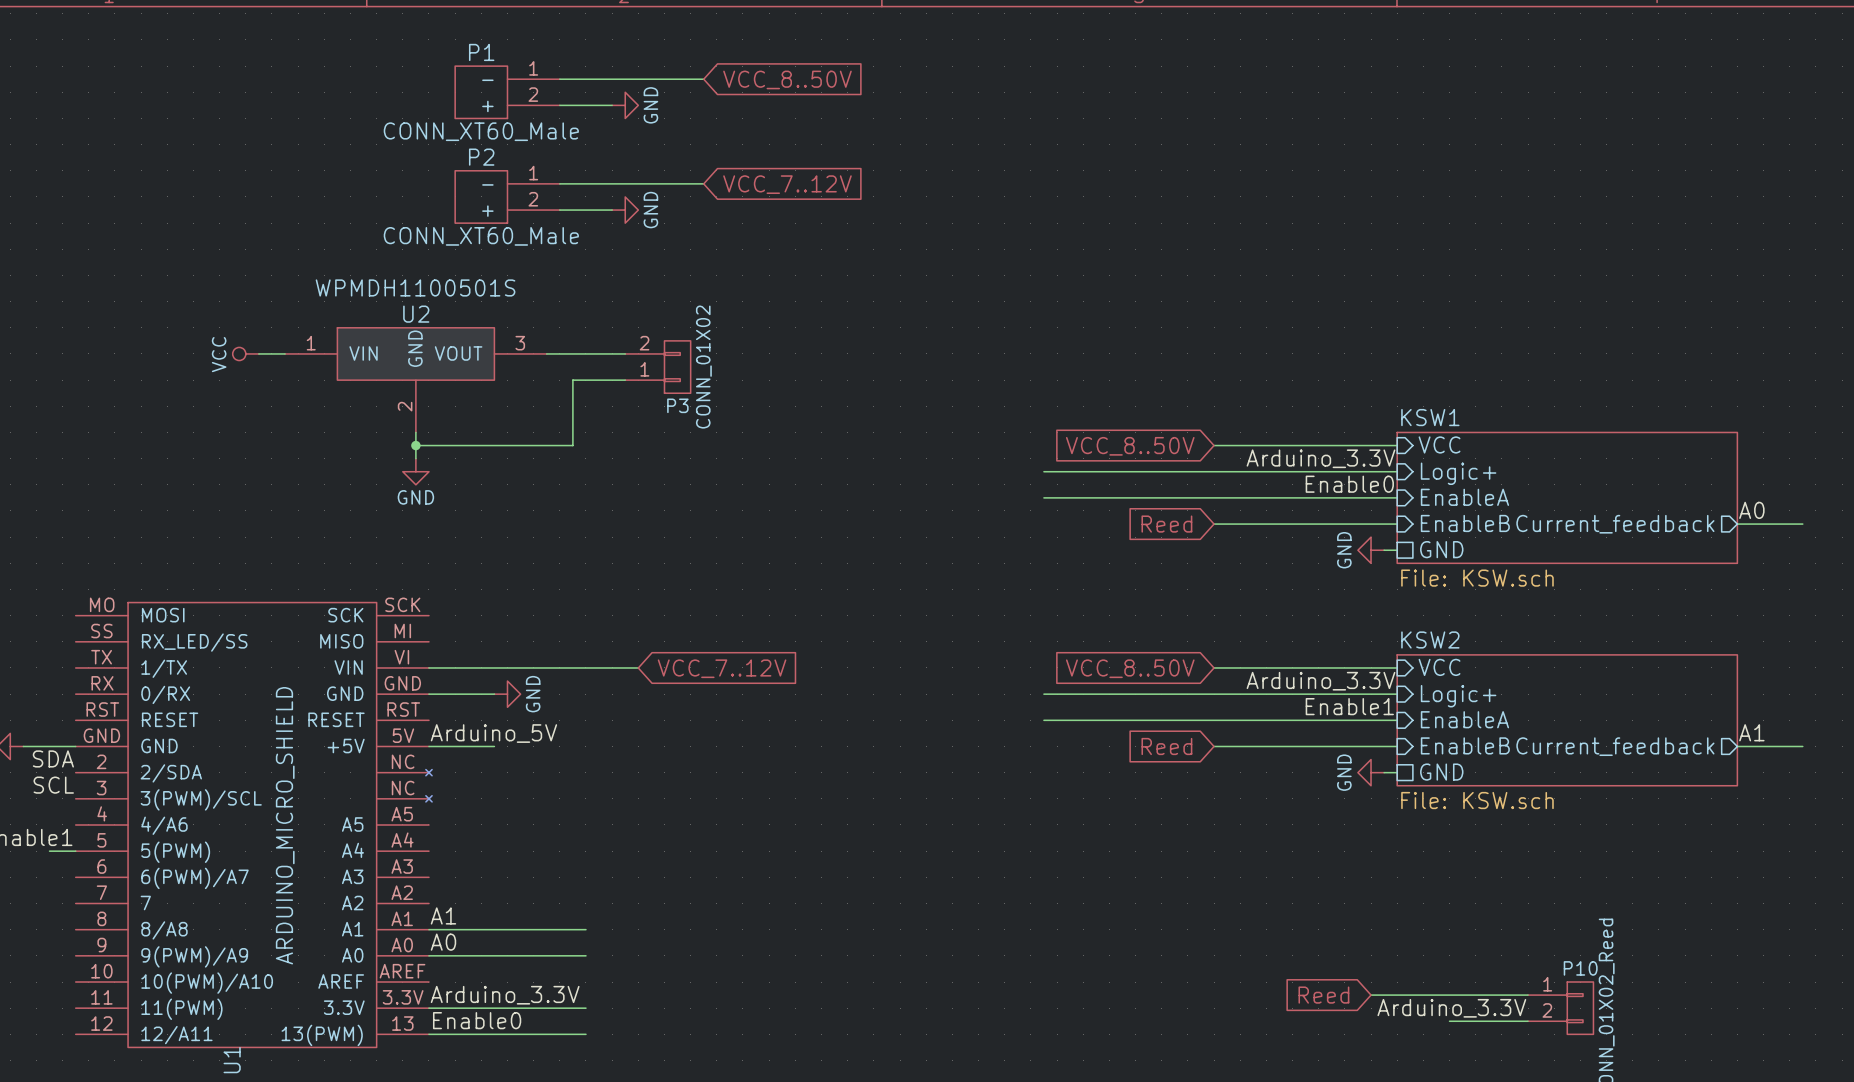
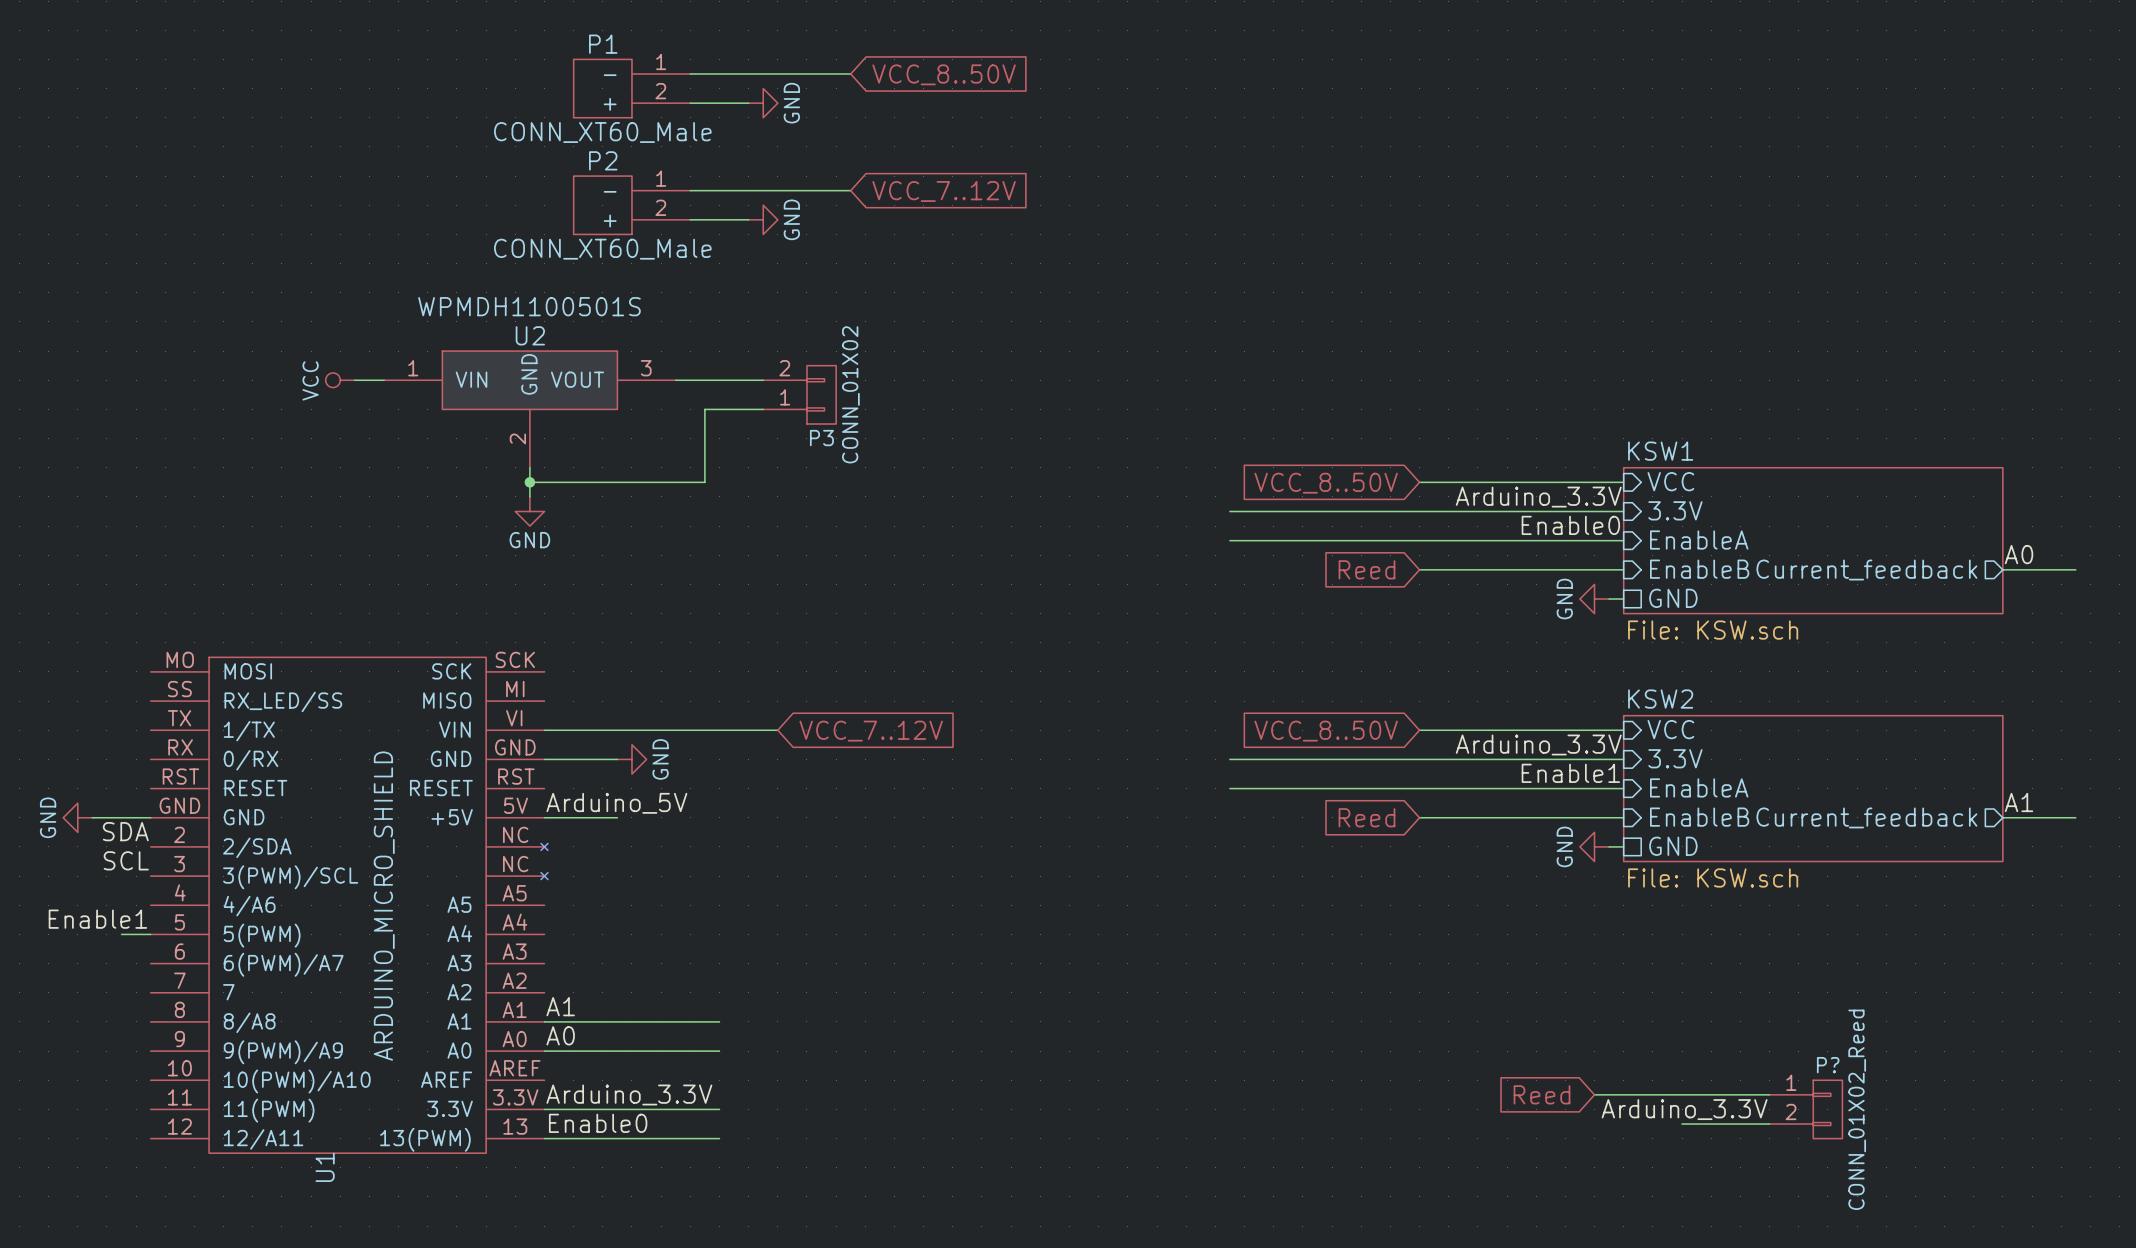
sheet pin: Logic+ (1458, 473) -> 3.3V (1675, 510)
sheet pin: Logic+ (1458, 696) -> 3.3V (1675, 758)
P10 name: P10 (1580, 968) -> P? (1828, 1065)

